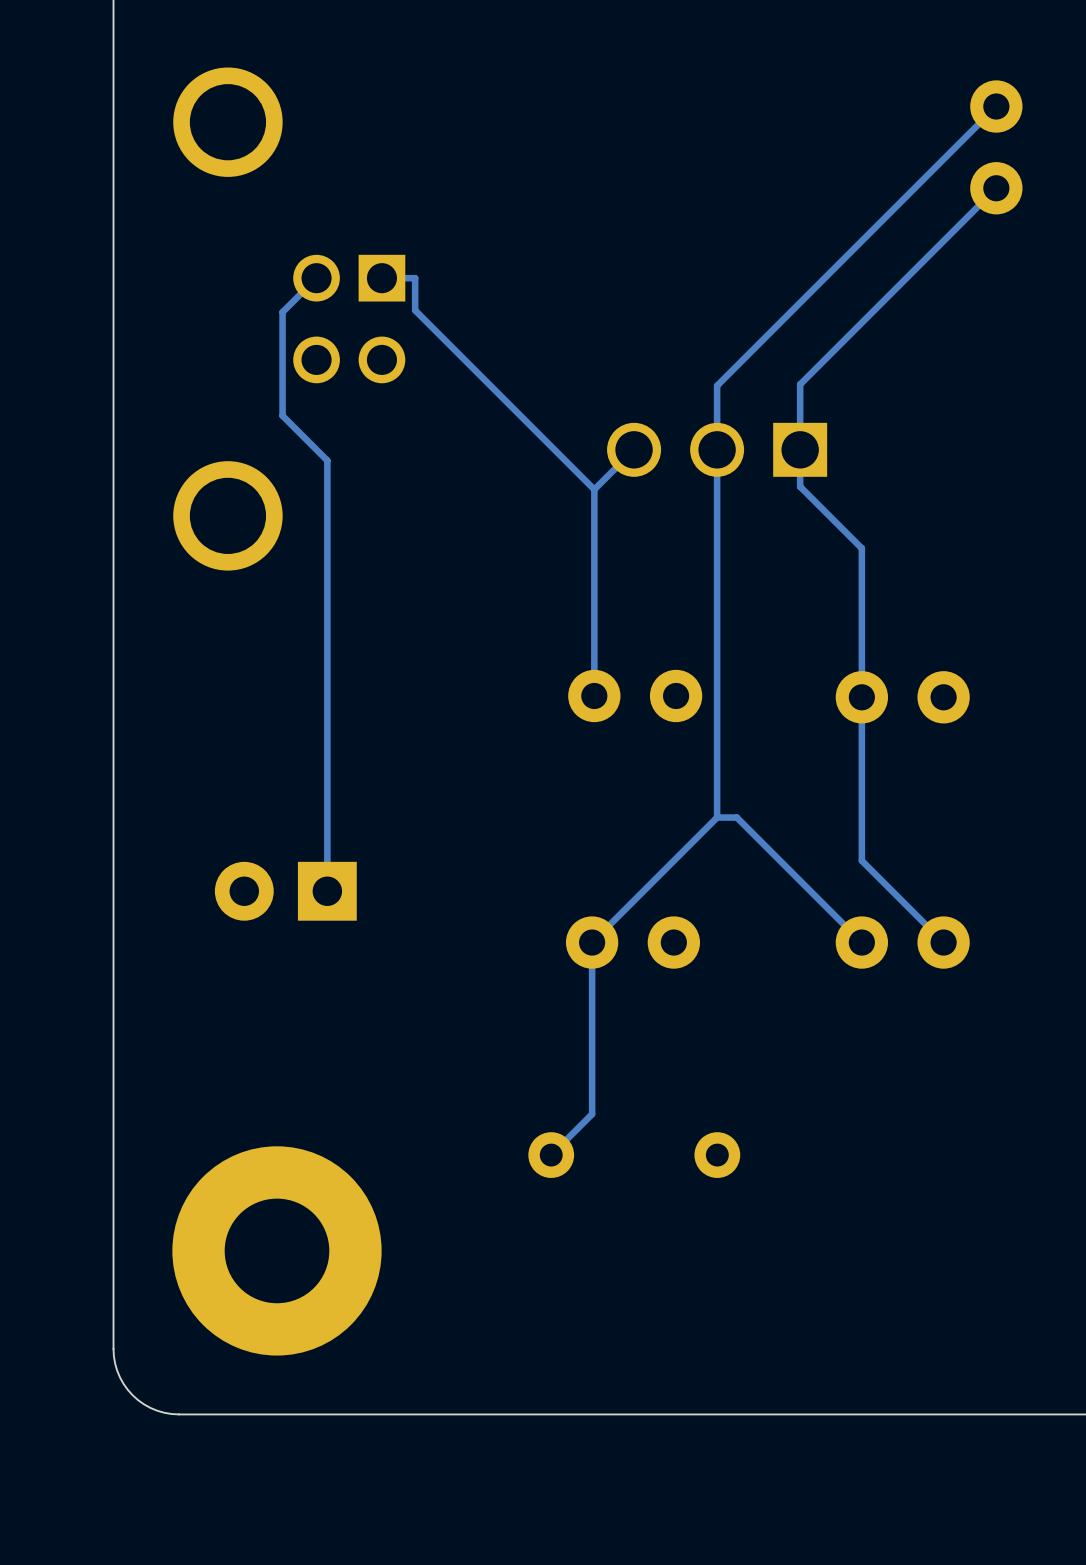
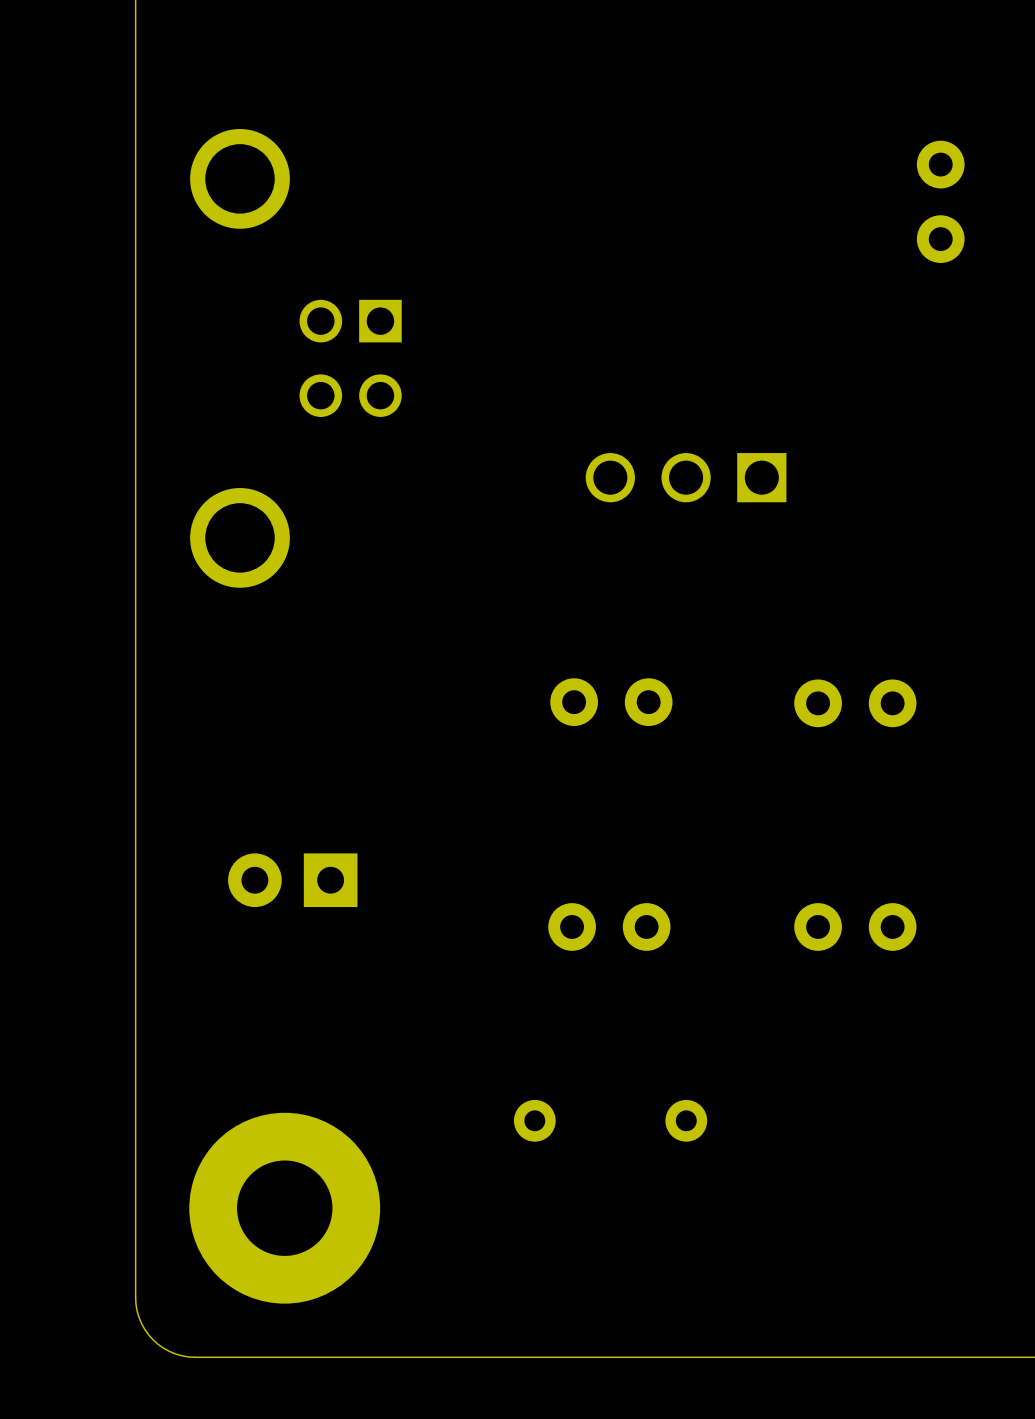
track: (996, 106) (717, 385) (717, 817) -> none
track: (996, 188) (800, 384) (800, 486) (861, 548) (861, 860) (943, 942) -> none
track: (316, 278) (282, 312) (282, 415) (327, 460) (327, 891) -> none
track: (381, 278) (415, 278) (415, 310) (594, 489) -> none
track: (634, 449) (594, 489) -> none
track: (594, 489) (594, 695) -> none
track: (717, 817) (736, 817) (861, 942) -> none
track: (717, 817) (592, 942) (592, 1114) (551, 1155) -> none

